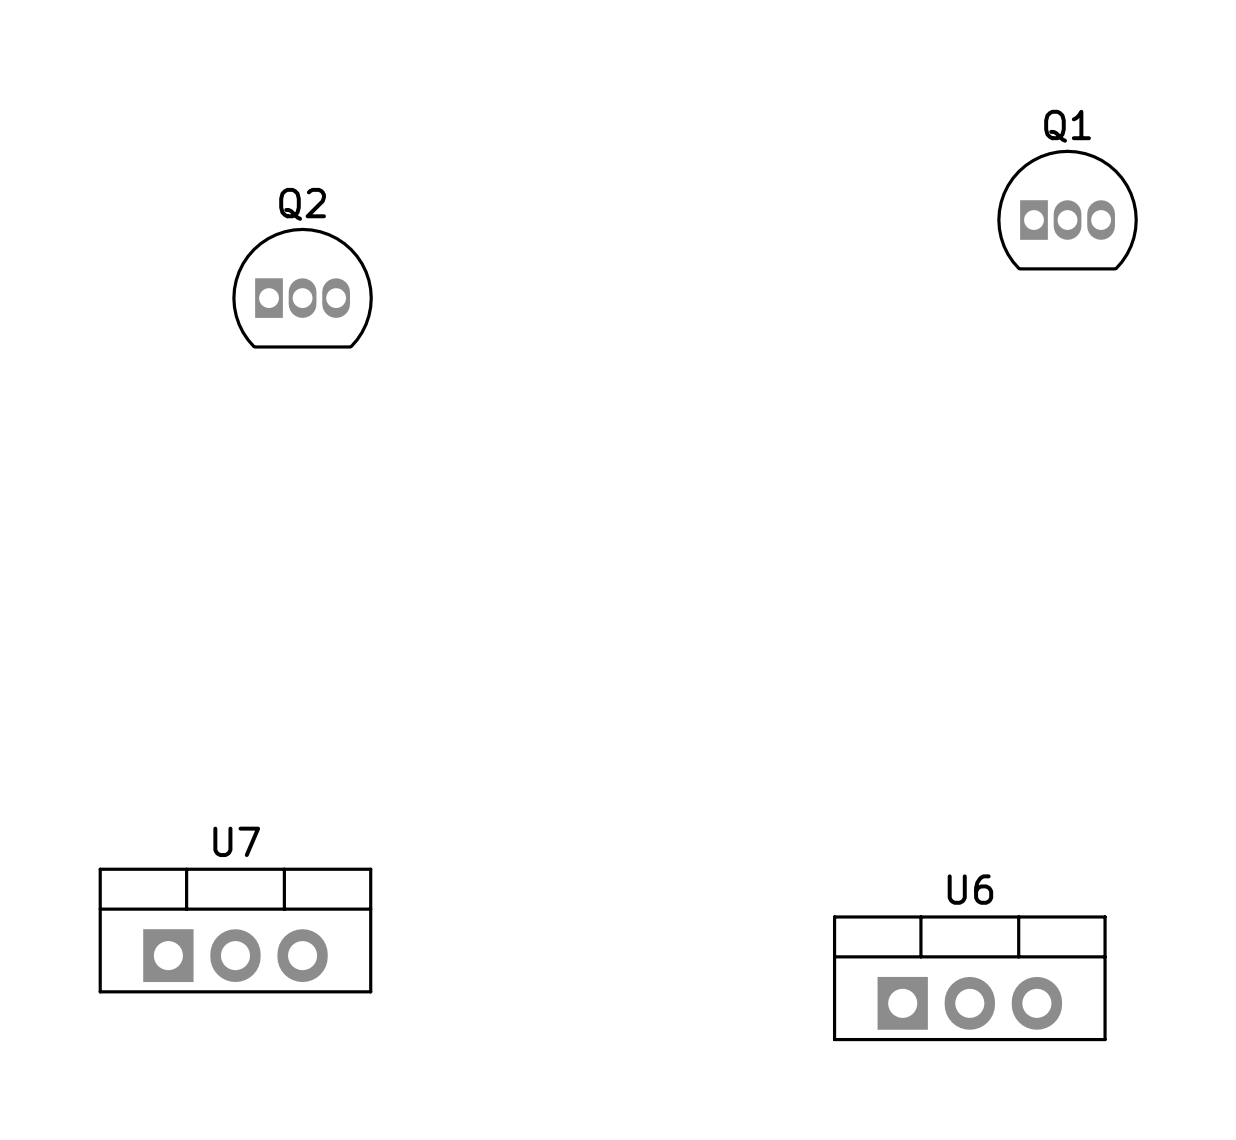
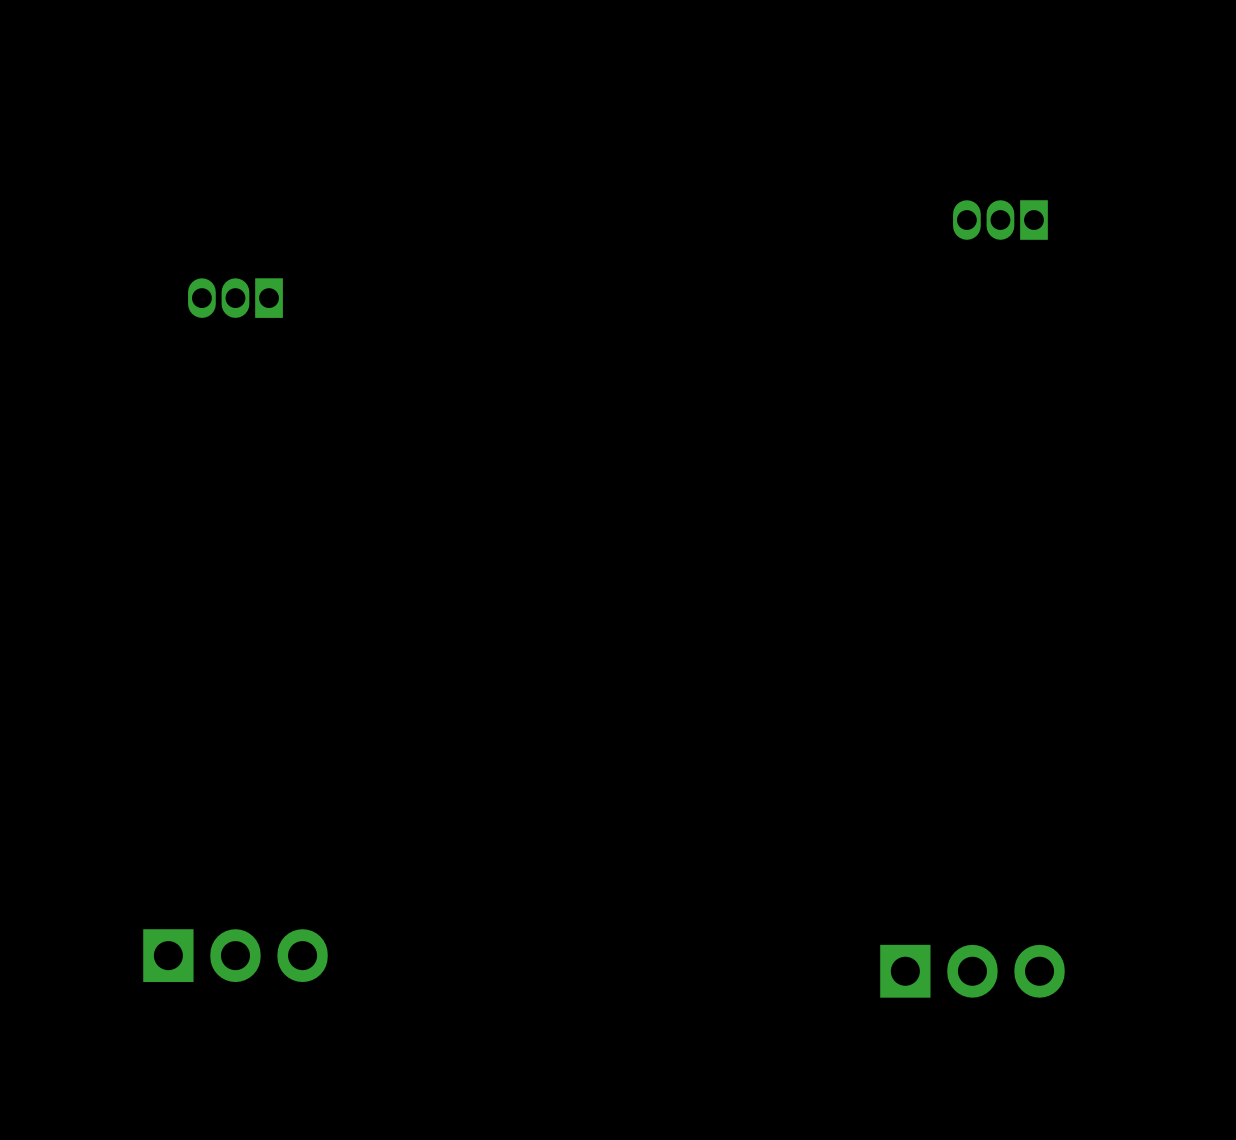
Q1 side: bottom (1067, 210) -> top (1000, 220)
Q2 side: bottom (302, 288) -> top (235, 298)
U7 side: bottom (235, 930) -> top (235, 955)
U6 side: bottom (969, 978) -> top (972, 971)

